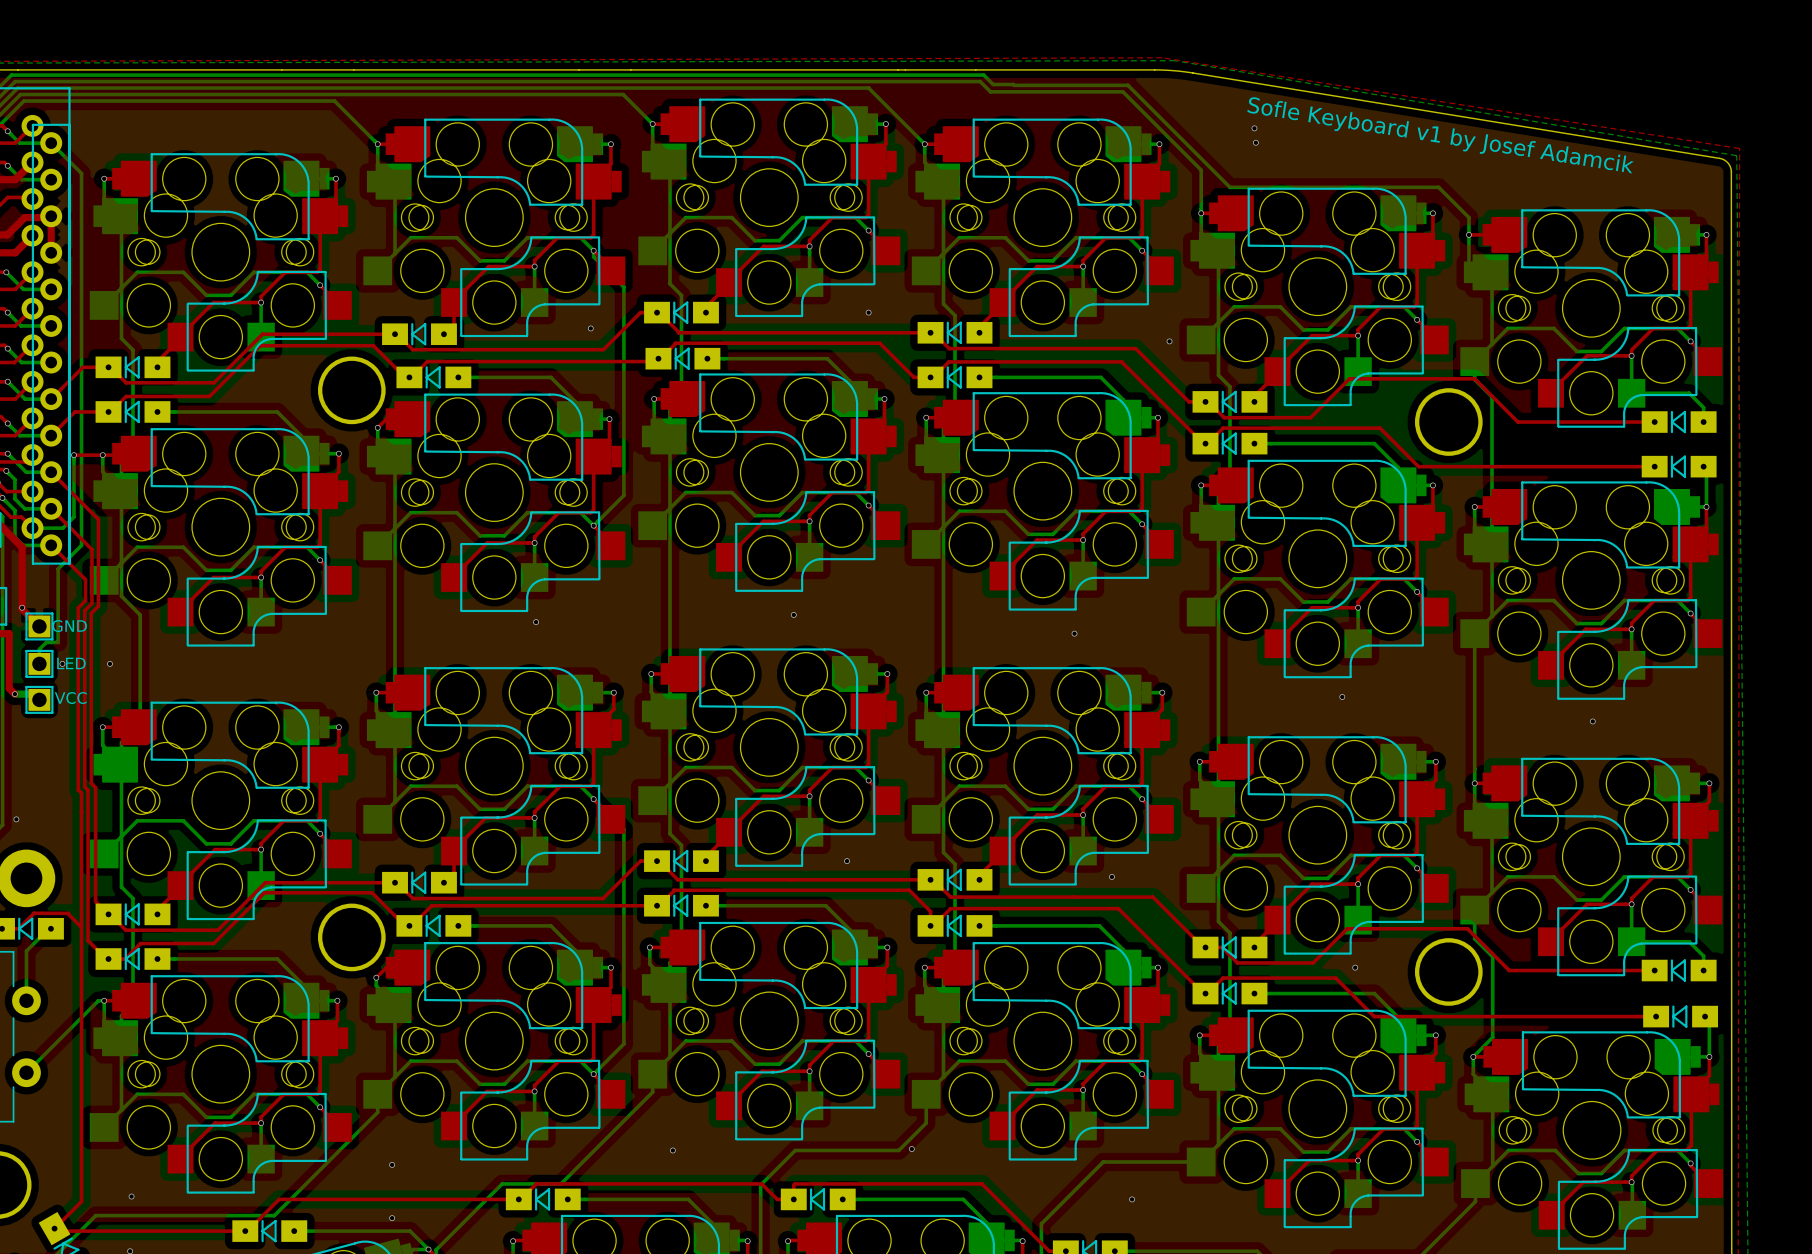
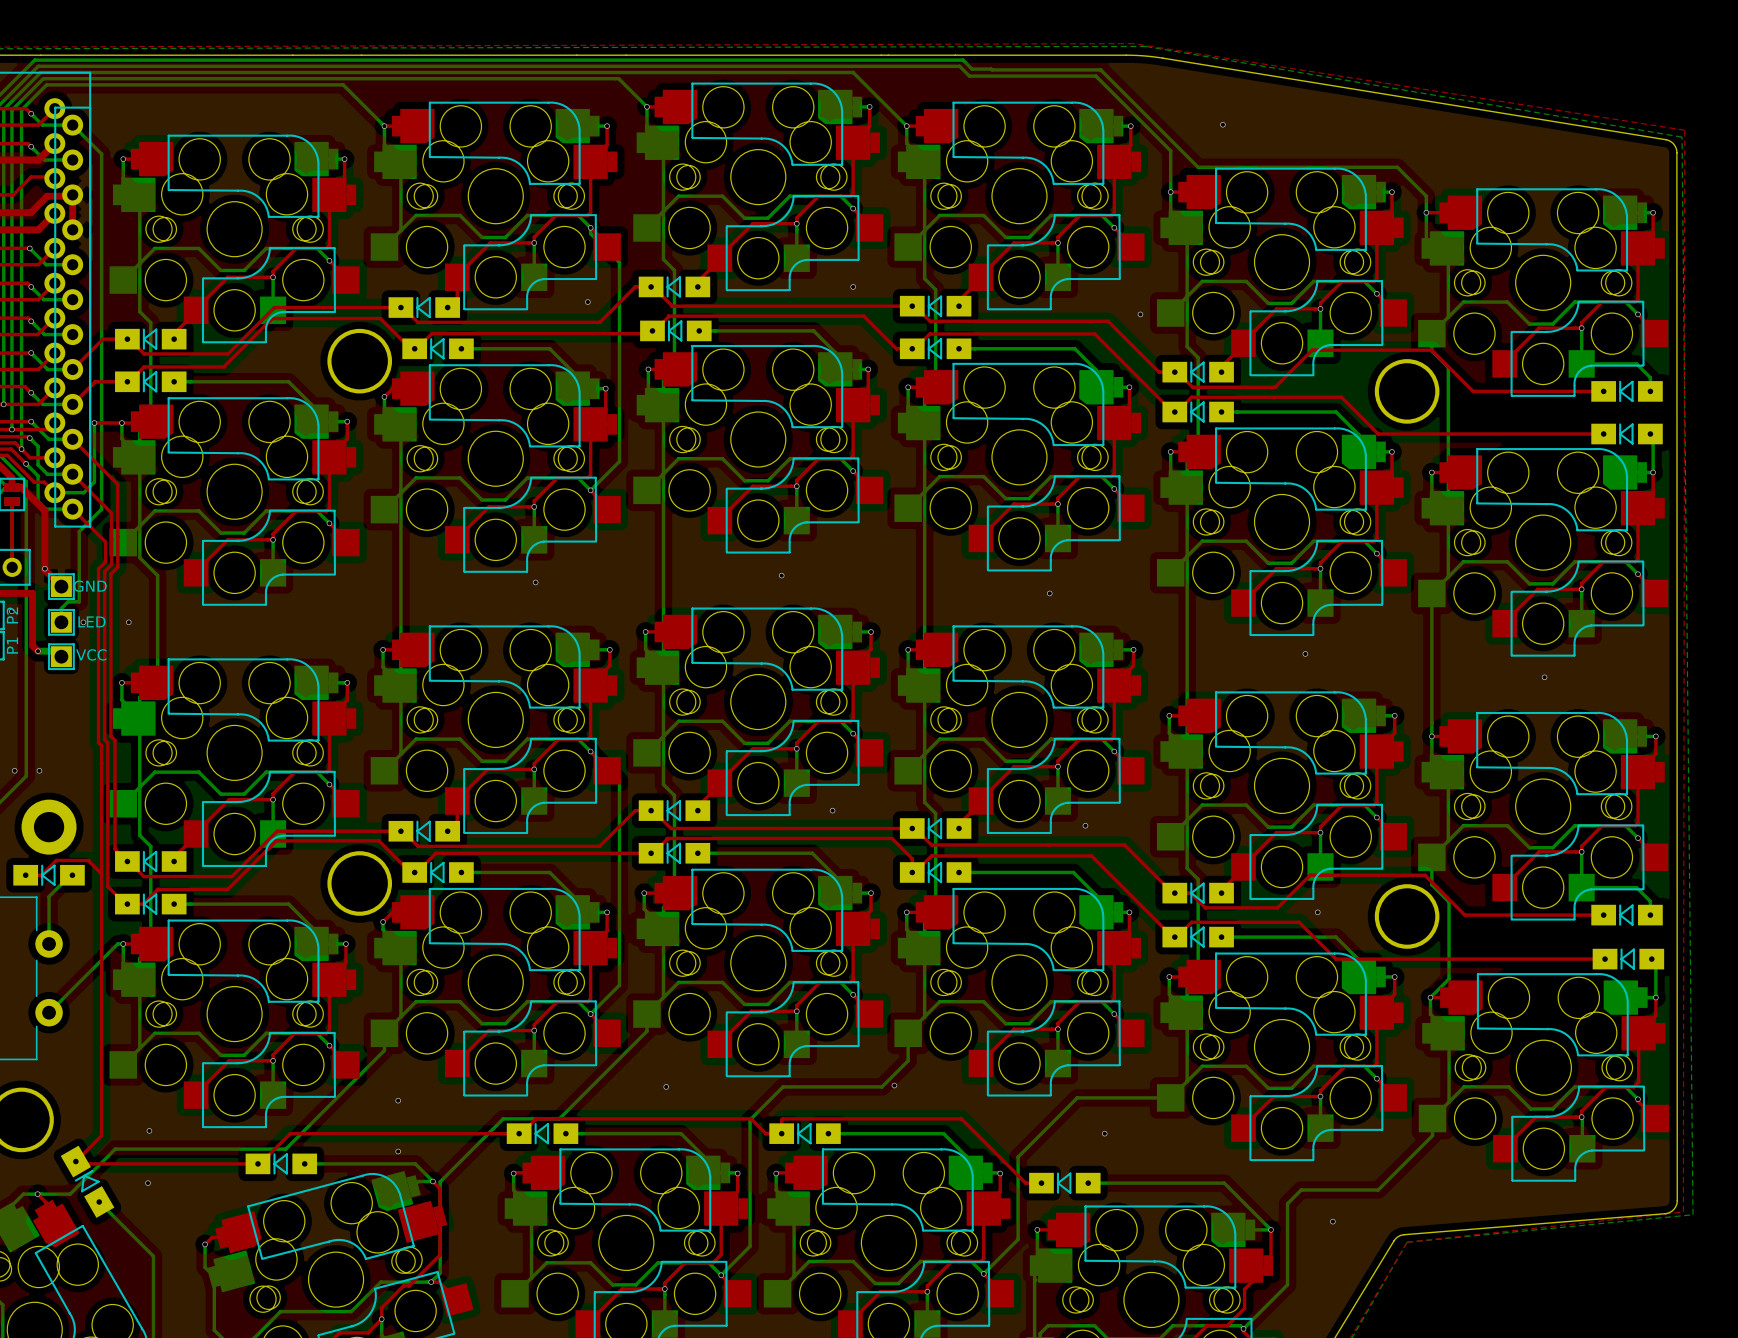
via: (1254, 128) -> none
text: Sofle Keyboard v1 by Josef Adamcik (1440, 135) -> none

